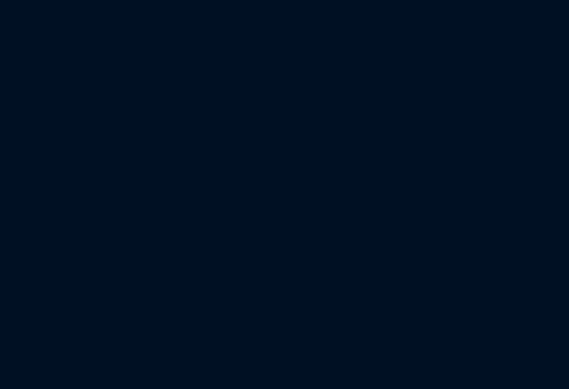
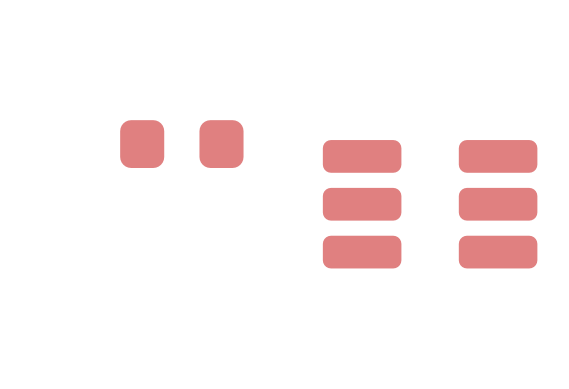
part: none -> (181, 144)
part: none -> (430, 204)

